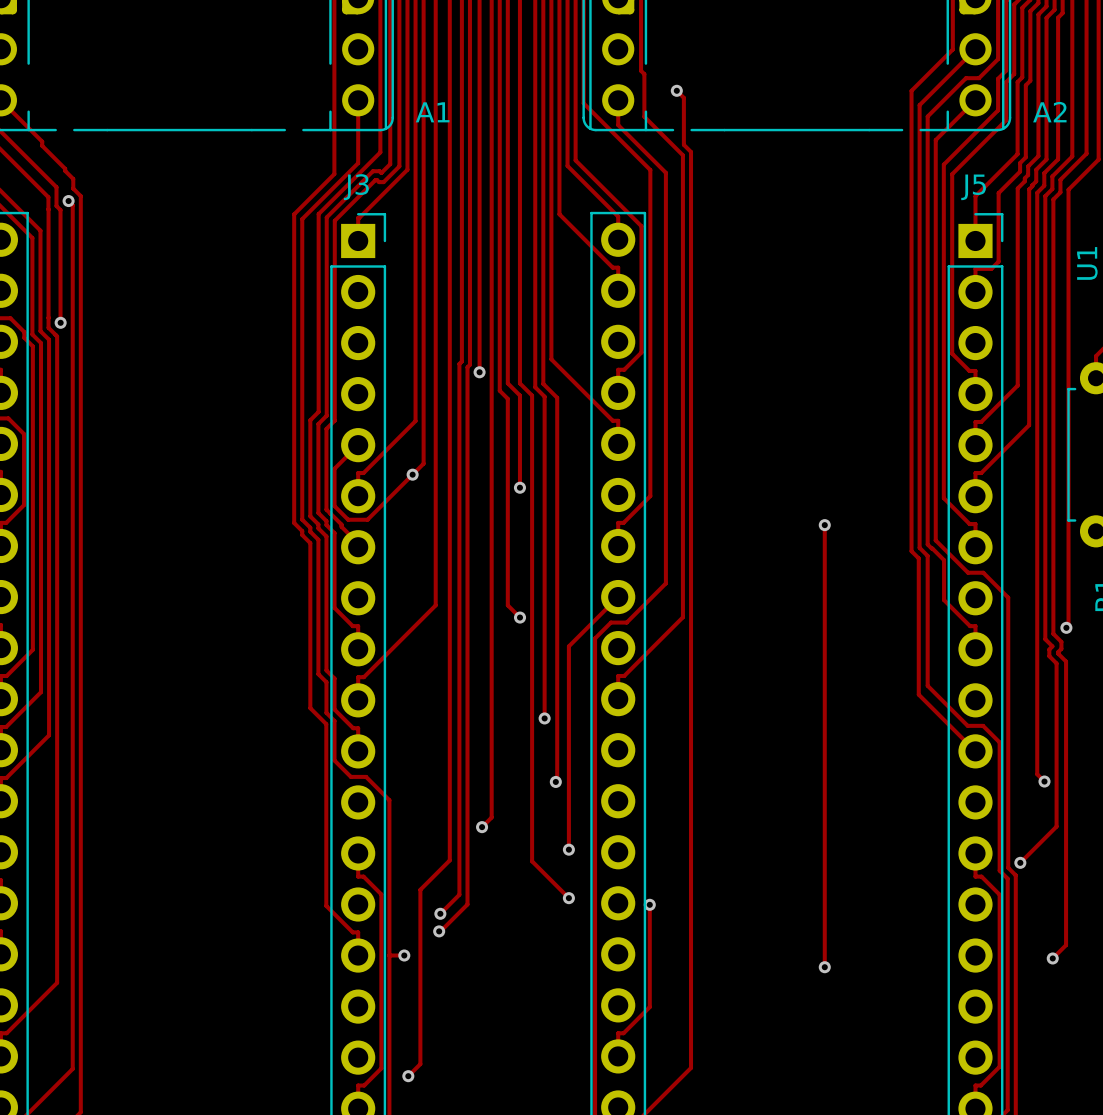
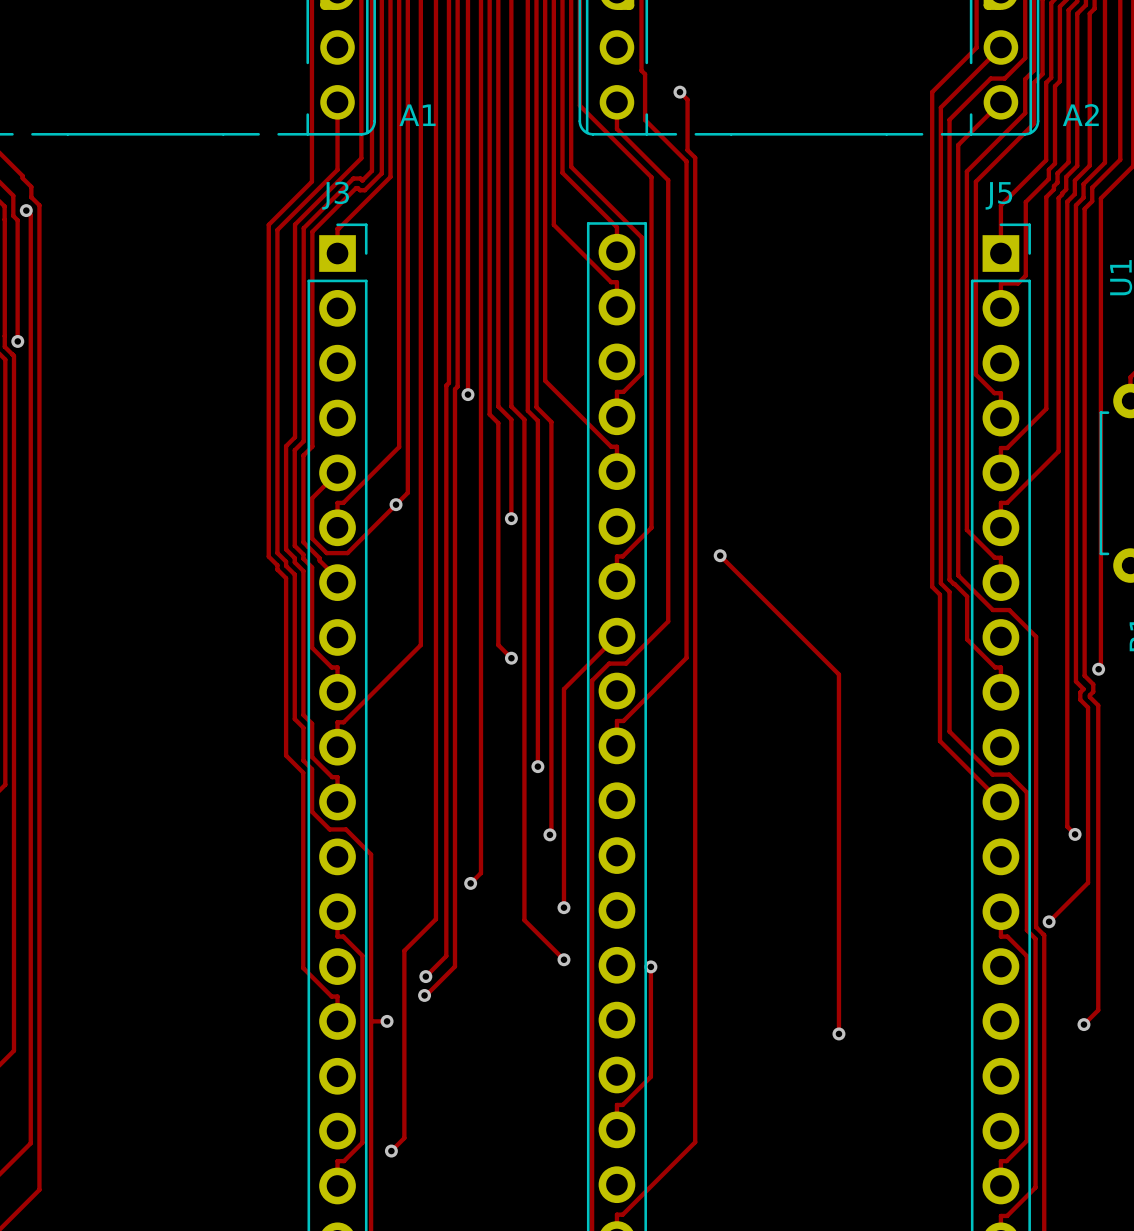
track: (824, 525) (824, 632) -> (720, 555) (838, 674)
via position: (824, 525) -> (720, 555)

